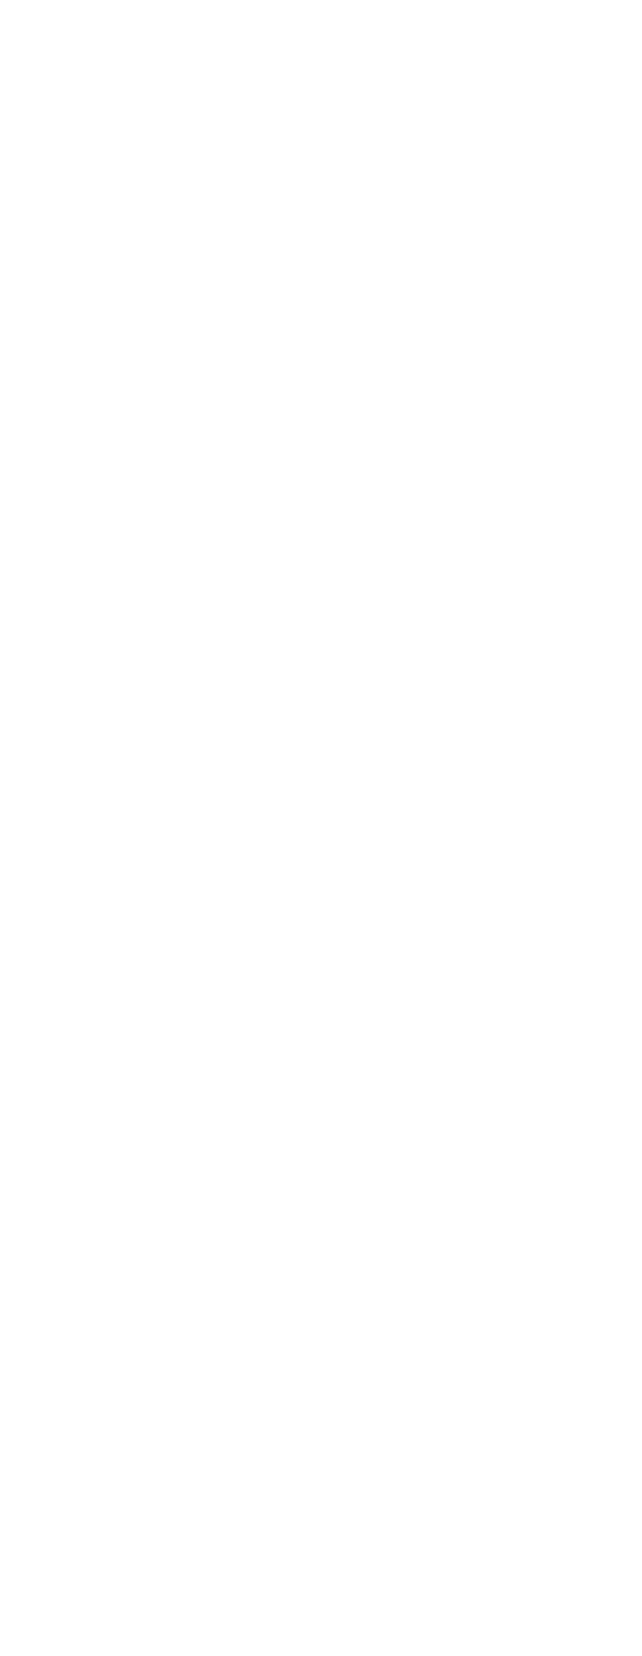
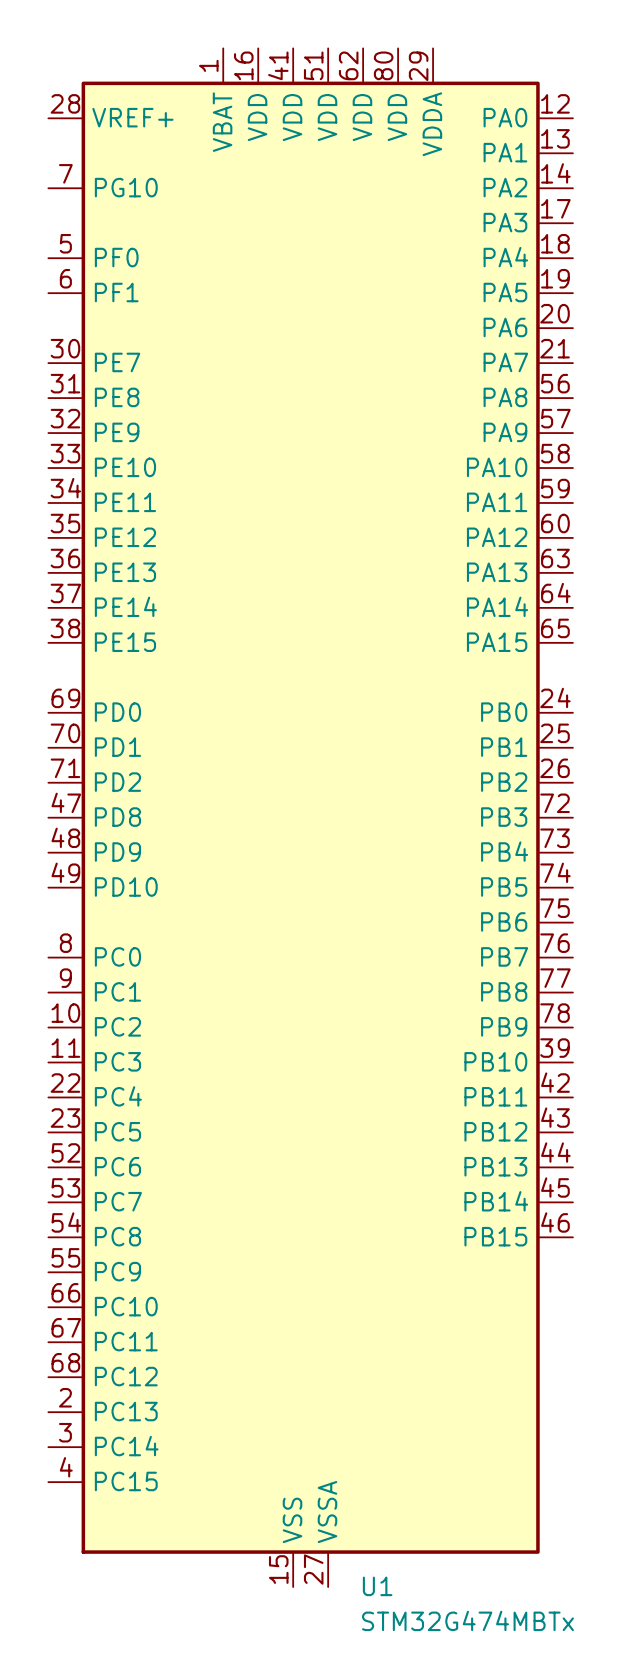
U1: none -> STM32G474MBTx (310, 817)

